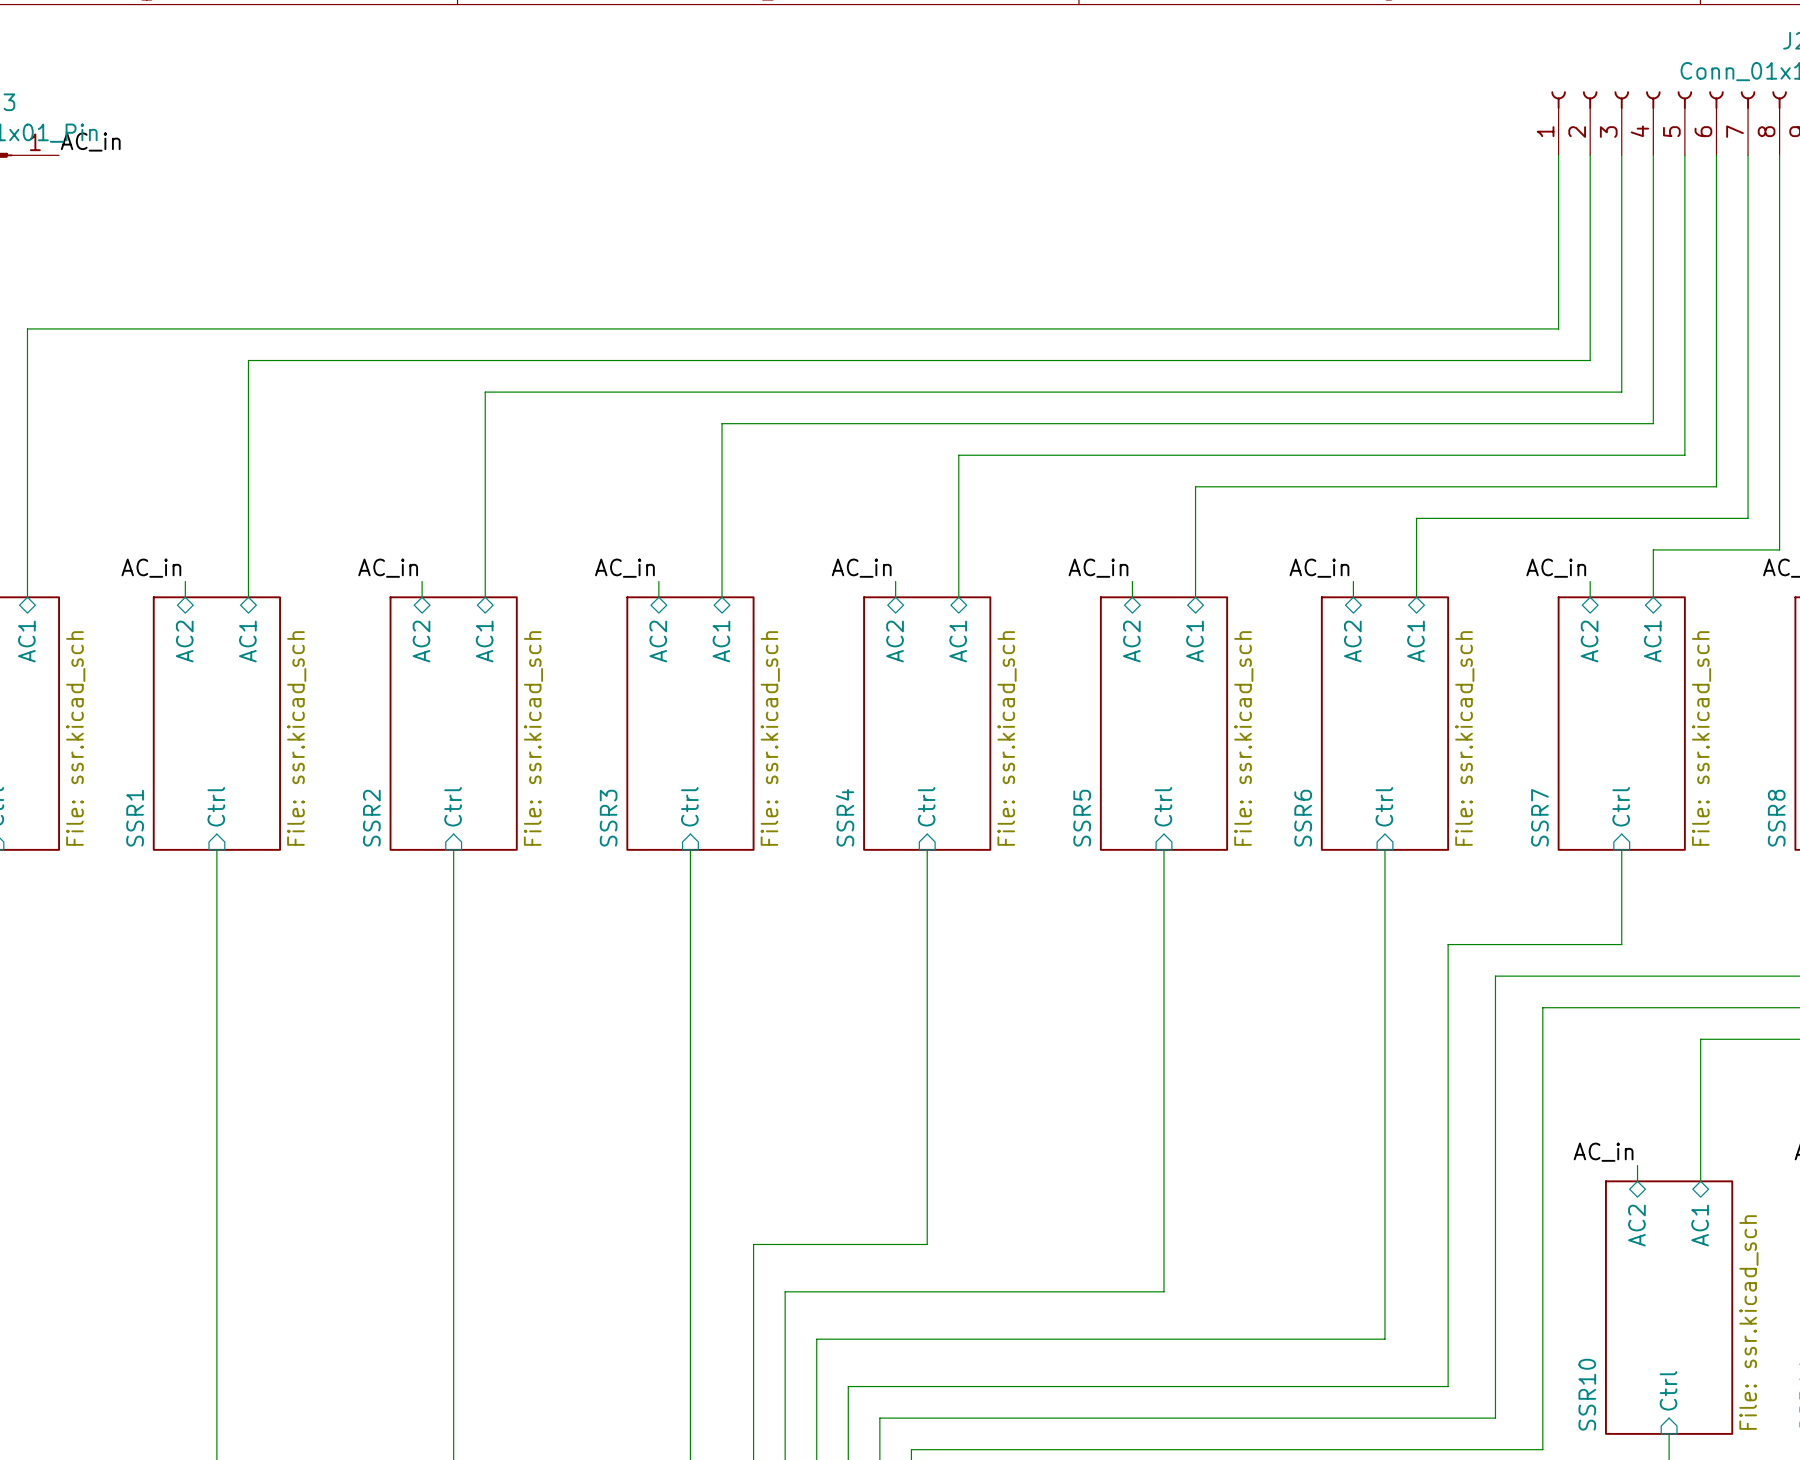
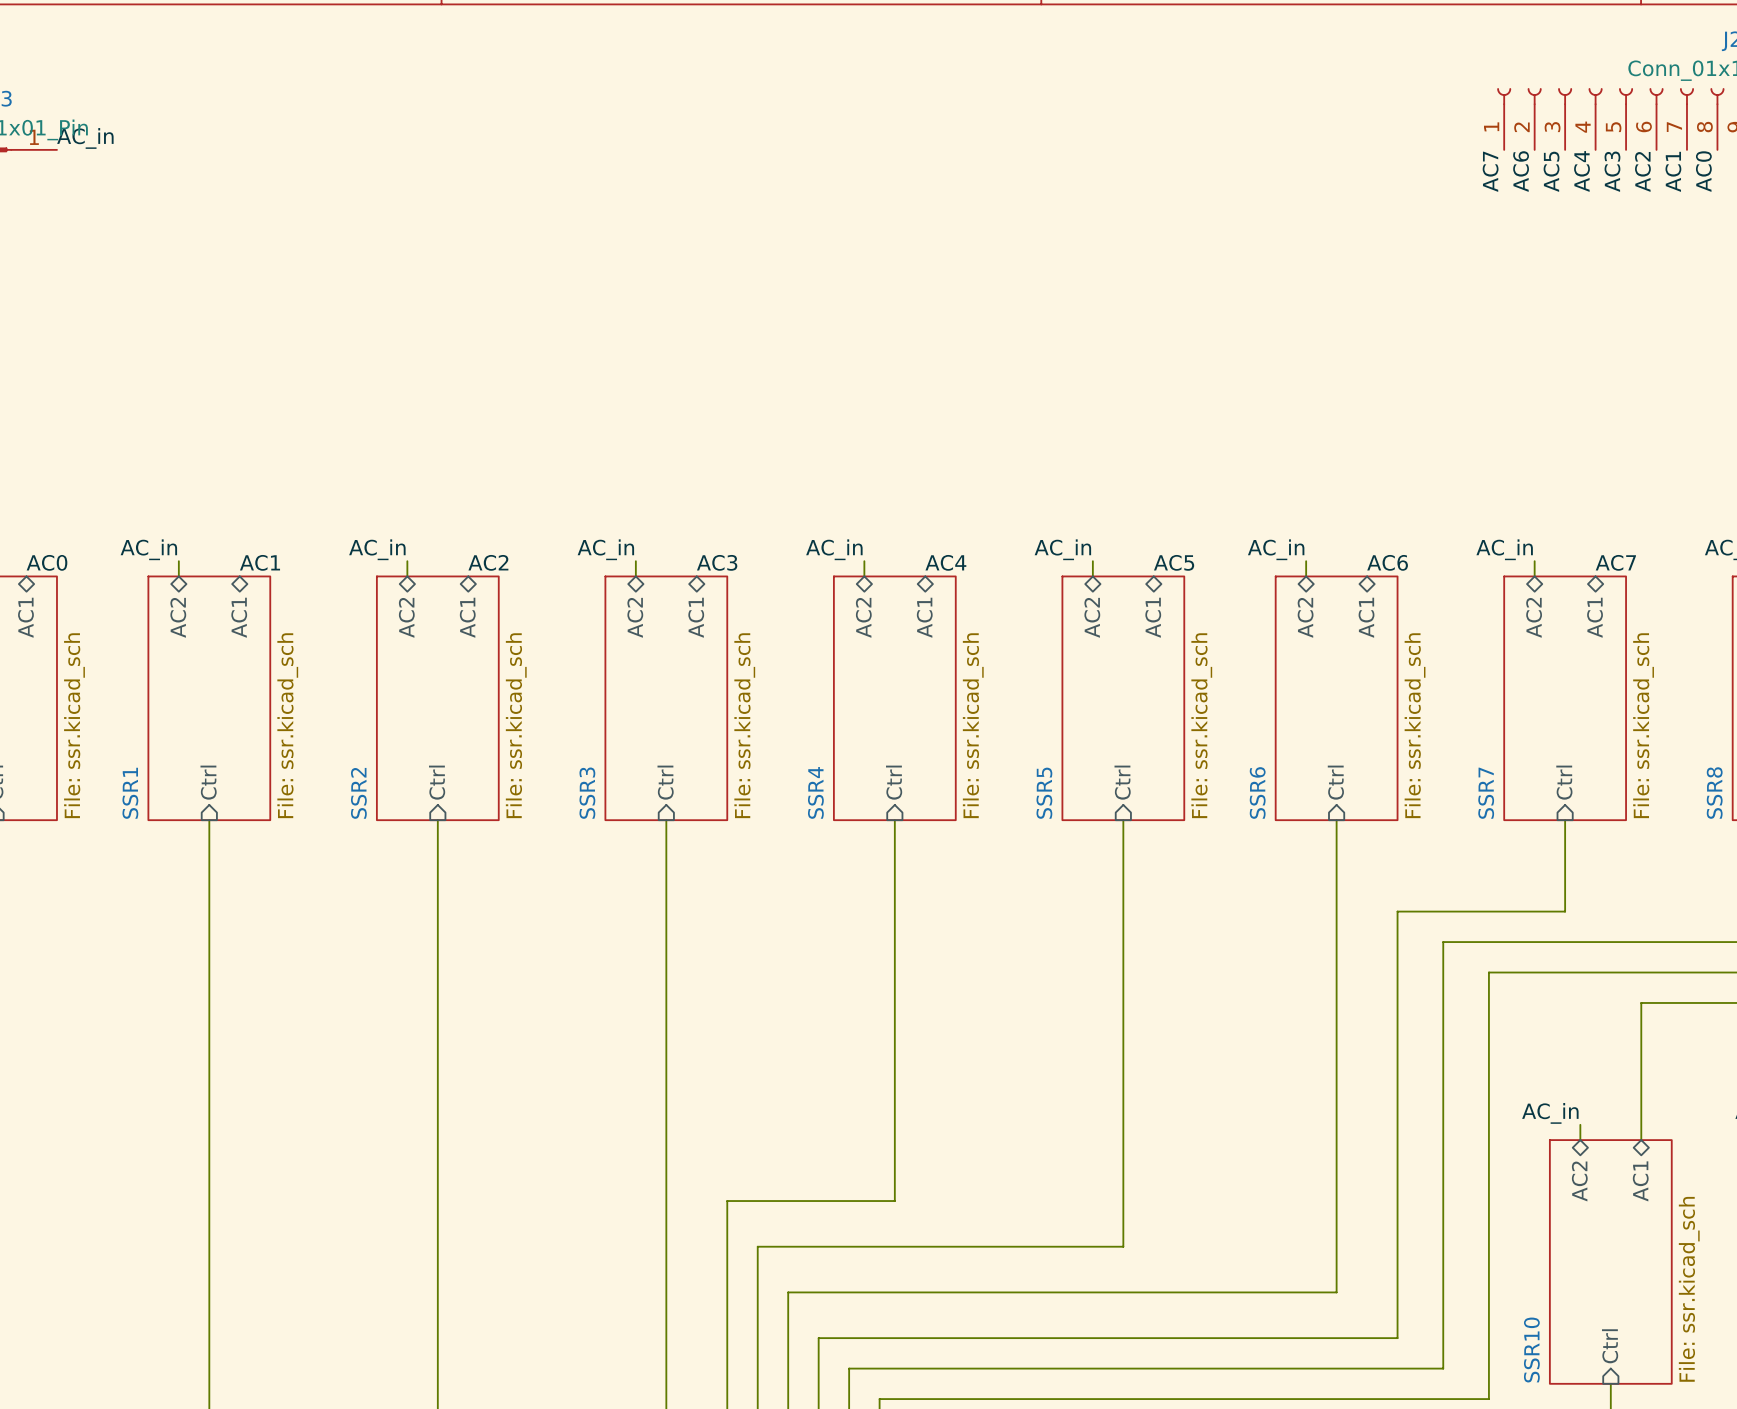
wire: (1558, 155) (1558, 328) (27, 328) (27, 597) -> none
wire: (1590, 155) (1590, 360) (248, 360) (248, 597) -> none
wire: (1621, 155) (1621, 392) (485, 392) (485, 597) -> none
wire: (1653, 155) (1653, 423) (722, 423) (722, 597) -> none
wire: (1684, 155) (1684, 455) (958, 455) (958, 597) -> none
wire: (1716, 155) (1716, 486) (1195, 486) (1195, 597) -> none
wire: (1748, 155) (1748, 518) (1416, 518) (1416, 597) -> none
wire: (1779, 155) (1779, 549) (1653, 549) (1653, 597) -> none
label: none -> AC7 (1490, 171)
label: none -> AC6 (1521, 171)
label: none -> AC5 (1551, 171)
label: none -> AC4 (1582, 171)
label: none -> AC3 (1612, 171)
label: none -> AC2 (1642, 171)
label: none -> AC1 (1673, 171)
label: none -> AC0 (1703, 171)
label: none -> AC4 (945, 562)
label: none -> AC0 (46, 562)
label: none -> AC1 (259, 562)
label: none -> AC2 (488, 562)
label: none -> AC3 (717, 562)
label: none -> AC5 (1174, 562)
label: none -> AC6 (1387, 562)
label: none -> AC7 (1615, 562)

